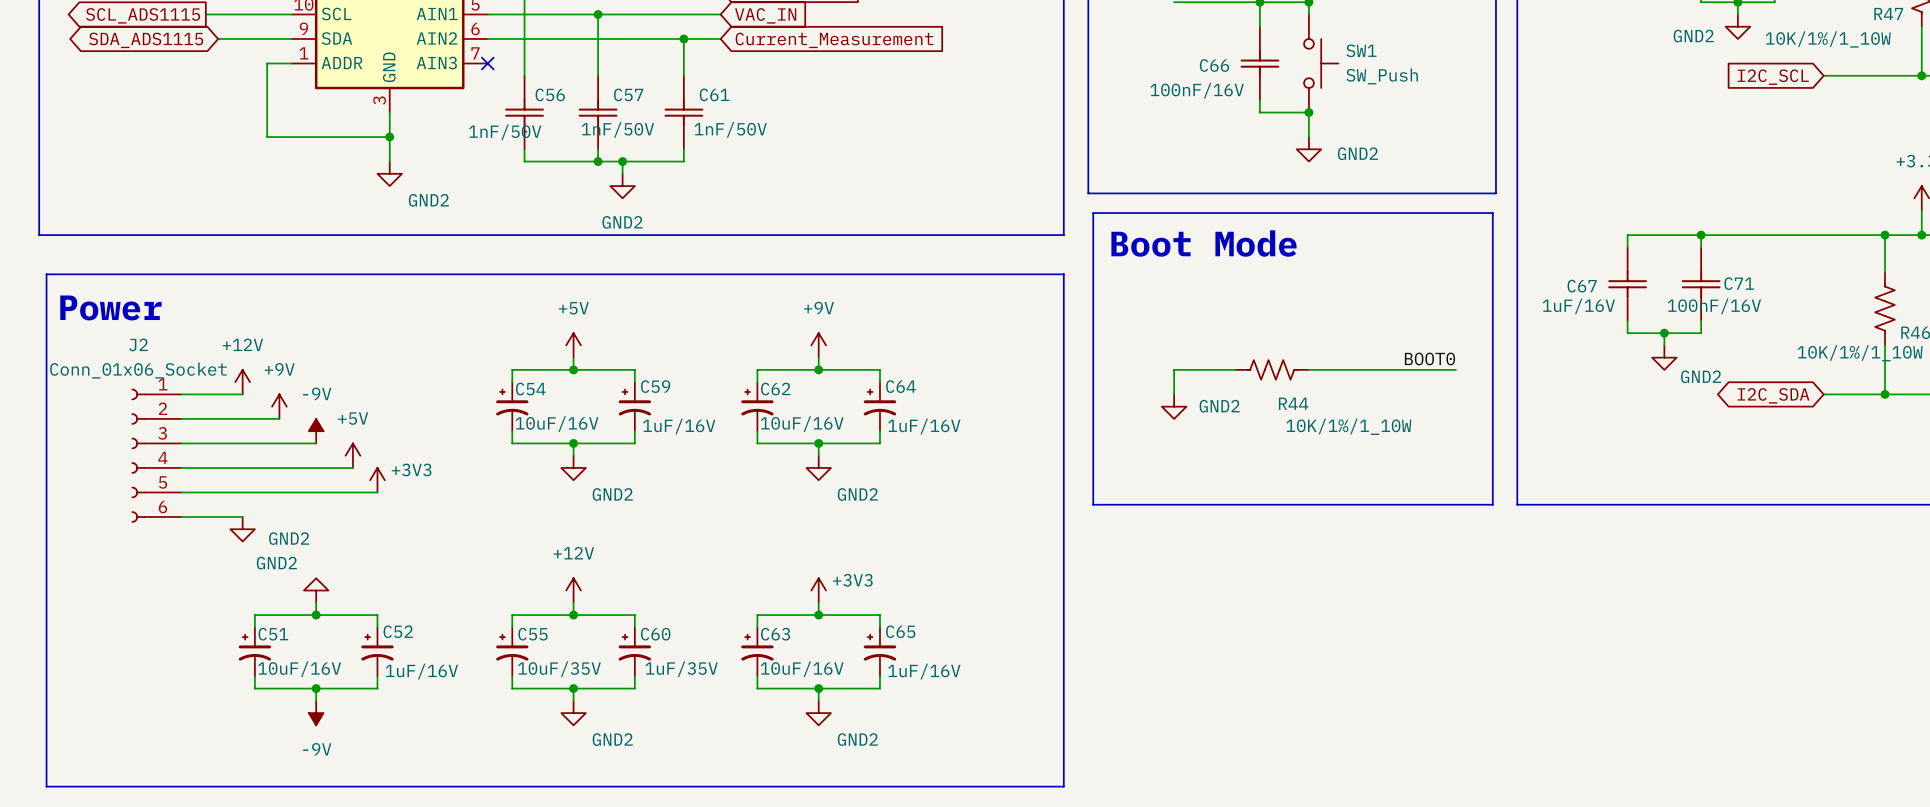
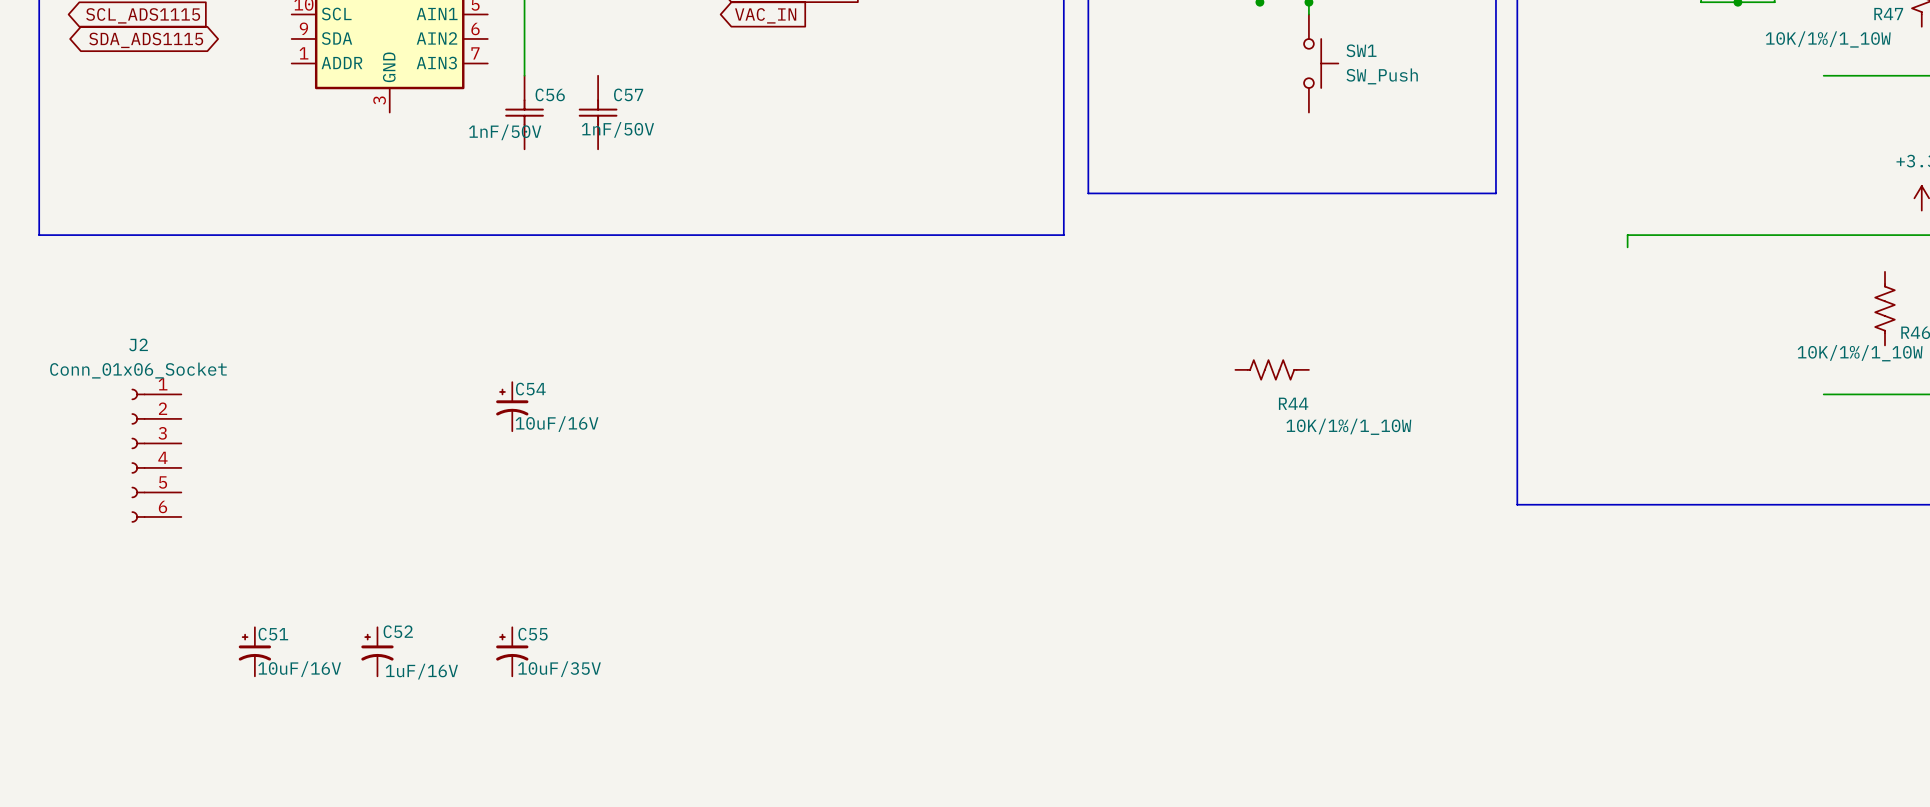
wire: (1174, 2) (1308, 2) -> none
wire: (1259, 2) (1259, 26) -> none
wire: (1737, 2) (1737, 14) -> none
wire: (205, 14) (291, 14) -> none
wire: (487, 14) (720, 14) -> none
wire: (598, 14) (598, 75) -> none
junction: (598, 14) -> none
power symbol: GND2 (1737, 26) -> none
wire: (1921, 26) (1921, 75) -> none
wire: (218, 38) (291, 38) -> none
wire: (487, 38) (720, 38) -> none
wire: (683, 38) (683, 75) -> none
junction: (683, 38) -> none
global label: Current_Measurement (834, 40) -> none
wire: (291, 63) (267, 63) (267, 137) (389, 137) -> none
no-connect mark: (487, 63) -> none
C66: 100nF/16V (1259, 63) -> none
junction: (1921, 75) -> none
global label: I2C_SCL (1773, 77) -> none
wire: (1259, 100) (1259, 112) (1308, 112) (1308, 137) -> none
wire: (389, 112) (389, 161) -> none
C61: 1nF/50V (683, 112) -> none
junction: (1308, 112) -> none
junction: (389, 137) -> none
wire: (524, 149) (524, 161) (683, 161) (683, 149) -> none
wire: (598, 149) (598, 161) -> none
power symbol: GND2 (1308, 149) -> none
junction: (598, 161) -> none
wire: (622, 161) (622, 173) -> none
junction: (622, 161) -> none
power symbol: GND2 (389, 173) -> none
power symbol: GND2 (622, 186) -> none
wire: (1921, 210) (1921, 235) -> none
line: (1093, 213) (1492, 213) (1492, 504) (1093, 504) (1093, 213) -> none
wire: (1701, 235) (1701, 247) -> none
junction: (1701, 235) -> none
wire: (1884, 235) (1884, 271) -> none
junction: (1884, 235) -> none
junction: (1921, 235) -> none
text: Boot Mode (1204, 243) -> none
line: (46, 274) (1063, 274) (1063, 786) (46, 786) (46, 274) -> none
C67: 1uF/16V (1627, 284) -> none
C71: 100nF/16V (1701, 284) -> none
text: Power (110, 307) -> none
wire: (1627, 320) (1627, 333) (1701, 333) (1701, 320) -> none
wire: (1664, 333) (1664, 345) -> none
junction: (1664, 333) -> none
power symbol: +5V (573, 345) -> none
power symbol: +9V (818, 345) -> none
wire: (1884, 345) (1884, 394) -> none
wire: (573, 357) (573, 369) -> none
wire: (818, 357) (818, 369) -> none
power symbol: GND2 (1664, 357) -> none
label: BOOT0 (1429, 358) -> none
junction: (573, 369) -> none
junction: (818, 369) -> none
wire: (1235, 369) (1174, 369) (1174, 394) -> none
wire: (1308, 369) (1456, 369) -> none
power symbol: +12V (242, 382) -> none
wire: (512, 382) (512, 369) (634, 369) (634, 382) -> none
wire: (757, 382) (757, 369) (879, 369) (879, 382) -> none
wire: (181, 394) (242, 394) -> none
junction: (1884, 394) -> none
global label: I2C_SDA (1773, 395) -> none
power symbol: +9V (279, 406) -> none
C59: 1uF/16V (634, 406) -> none
C62: 10uF/16V (757, 406) -> none
C64: 1uF/16V (879, 406) -> none
power symbol: GND2 (1174, 406) -> none
wire: (181, 418) (279, 418) -> none
power symbol: -9V (316, 431) -> none
wire: (512, 431) (512, 443) (634, 443) (634, 431) -> none
wire: (757, 431) (757, 443) (879, 443) (879, 431) -> none
wire: (181, 443) (316, 443) -> none
wire: (573, 443) (573, 455) -> none
junction: (573, 443) -> none
wire: (818, 443) (818, 455) -> none
junction: (818, 443) -> none
power symbol: +5V (352, 455) -> none
wire: (181, 467) (352, 467) -> none
power symbol: GND2 (573, 467) -> none
power symbol: GND2 (818, 467) -> none
power symbol: +3V3 (377, 480) -> none
wire: (181, 492) (377, 492) -> none
wire: (181, 516) (242, 516) -> none
power symbol: GND2 (242, 529) -> none
power symbol: GND2 (316, 590) -> none
power symbol: +12V (573, 590) -> none
power symbol: +3V3 (818, 590) -> none
wire: (316, 602) (316, 615) -> none
wire: (573, 602) (573, 615) -> none
wire: (818, 602) (818, 615) -> none
junction: (316, 615) -> none
junction: (573, 615) -> none
junction: (818, 615) -> none
wire: (254, 627) (254, 615) (377, 615) (377, 627) -> none
wire: (512, 627) (512, 615) (634, 615) (634, 627) -> none
wire: (757, 627) (757, 615) (879, 615) (879, 627) -> none
C60: 1uF/35V (634, 651) -> none
C63: 10uF/16V (757, 651) -> none
C65: 1uF/16V (879, 651) -> none
wire: (254, 676) (254, 688) (377, 688) (377, 676) -> none
wire: (512, 676) (512, 688) (634, 688) (634, 676) -> none
wire: (757, 676) (757, 688) (879, 688) (879, 676) -> none
wire: (316, 688) (316, 700) -> none
junction: (316, 688) -> none
wire: (573, 688) (573, 700) -> none
junction: (573, 688) -> none
wire: (818, 688) (818, 700) -> none
junction: (818, 688) -> none
power symbol: -9V (316, 713) -> none
power symbol: GND2 (573, 713) -> none
power symbol: GND2 (818, 713) -> none

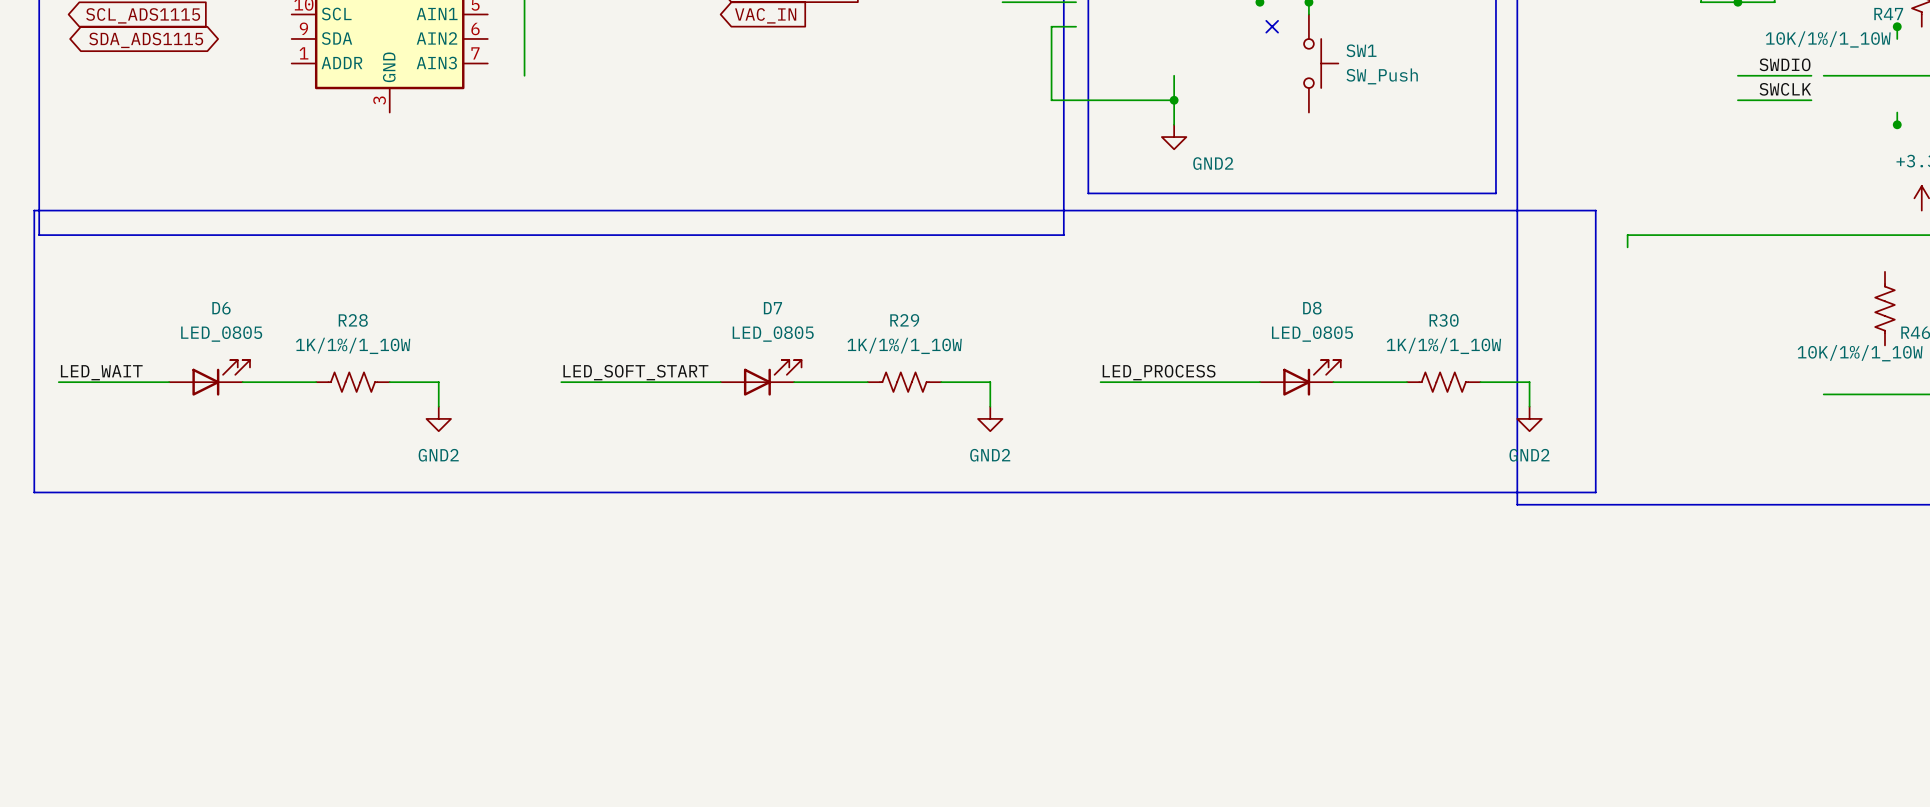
wire: none -> (1002, 2) (1076, 2)
wire: none -> (1076, 26) (1051, 26) (1051, 100) (1174, 100)
no-connect mark: none -> (1272, 26)
wire: none -> (1897, 26) (1897, 38)
junction: none -> (1897, 26)
label: none -> SWDIO (1785, 64)
wire: none -> (1174, 75) (1174, 124)
wire: none -> (1737, 75) (1811, 75)
label: none -> SWCLK (1785, 89)
junction: none -> (1174, 100)
wire: none -> (1737, 100) (1811, 100)
C56: 1nF/50V (524, 112) -> none
C57: 1nF/50V (598, 112) -> none
wire: none -> (1897, 112) (1897, 124)
junction: none -> (1897, 124)
power symbol: none -> GND2 (1174, 137)
line: none -> (34, 210) (34, 492) (1595, 492) (1595, 210) (34, 210)
R44: 10K/1%/1_10W (1272, 369) -> none
label: none -> LED_WAIT (101, 372)
label: none -> LED_SOFT_START (635, 372)
label: none -> LED_PROCESS (1159, 372)
D6: none -> LED_0805 (209, 377)
D7: none -> LED_0805 (761, 377)
D8: none -> LED_0805 (1300, 377)
wire: none -> (58, 382) (169, 382)
wire: none -> (242, 382) (316, 382)
R28: none -> 1K/1%/1_10W (352, 382)
wire: none -> (389, 382) (438, 382) (438, 406)
wire: none -> (561, 382) (720, 382)
wire: none -> (794, 382) (867, 382)
R29: none -> 1K/1%/1_10W (904, 382)
wire: none -> (941, 382) (990, 382) (990, 406)
wire: none -> (1100, 382) (1259, 382)
wire: none -> (1333, 382) (1407, 382)
R30: none -> 1K/1%/1_10W (1443, 382)
wire: none -> (1480, 382) (1529, 382) (1529, 406)
C54: 10uF/16V (512, 406) -> none
power symbol: none -> GND2 (438, 418)
power symbol: none -> GND2 (990, 418)
power symbol: none -> GND2 (1529, 418)
J2: Conn_01x06_Socket (156, 455) -> none
C51: 10uF/16V (254, 651) -> none
C52: 1uF/16V (377, 651) -> none
C55: 10uF/35V (512, 651) -> none

